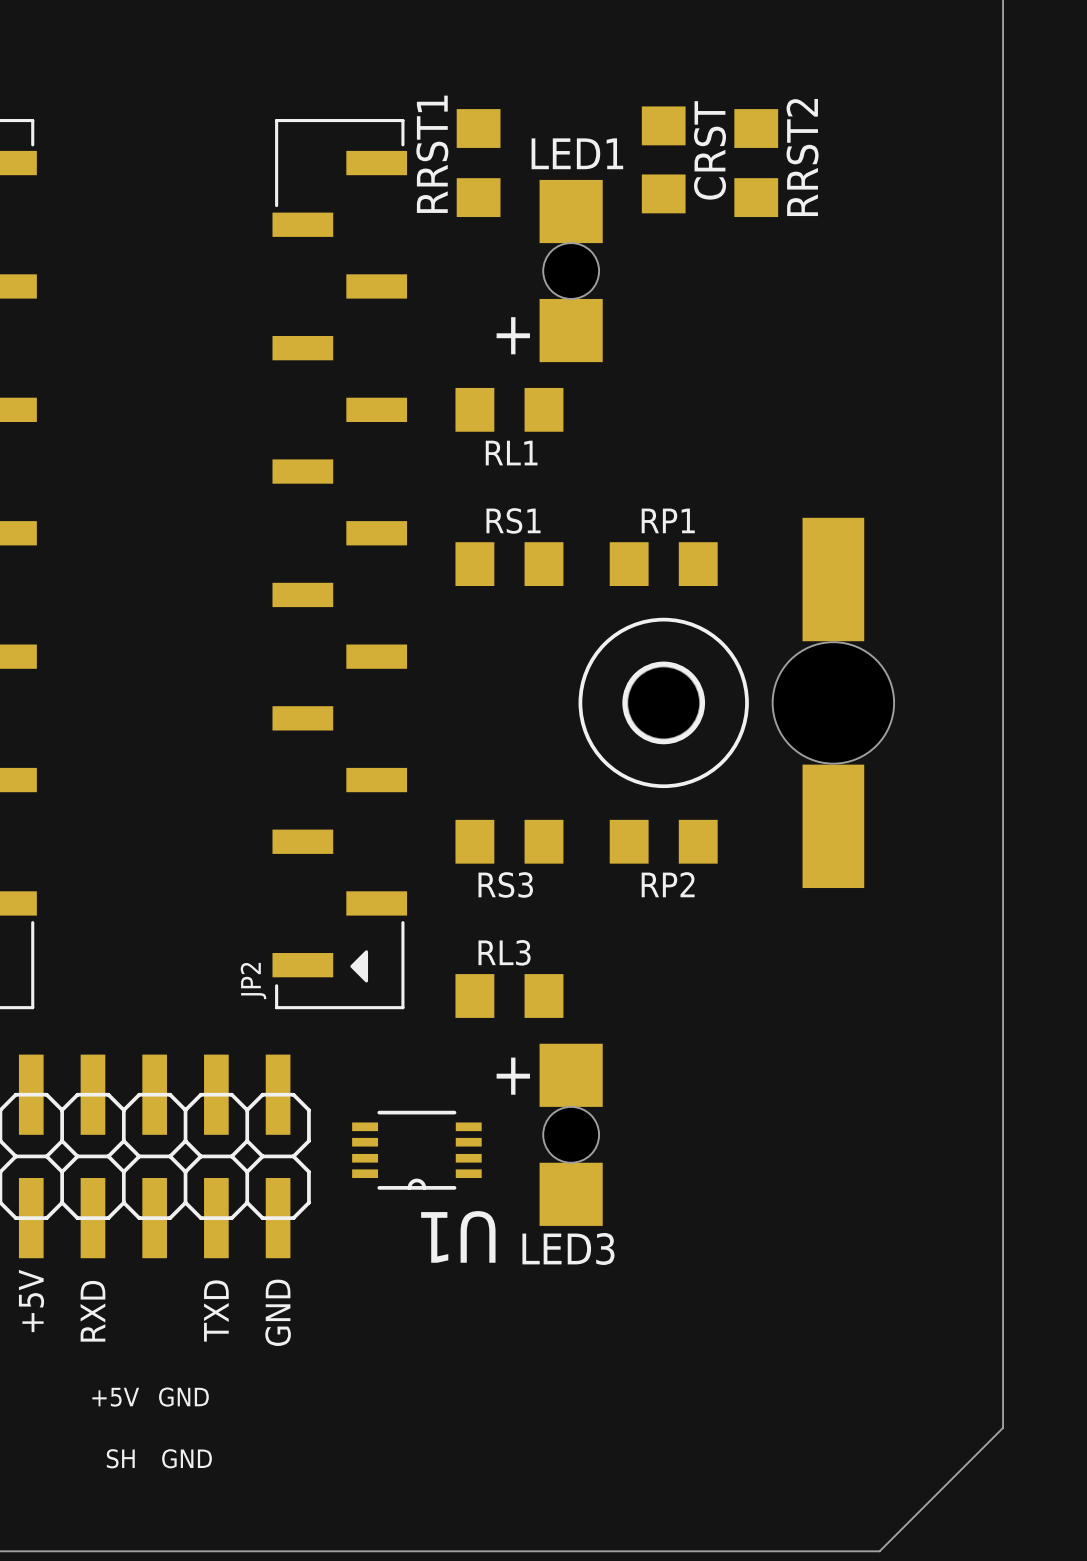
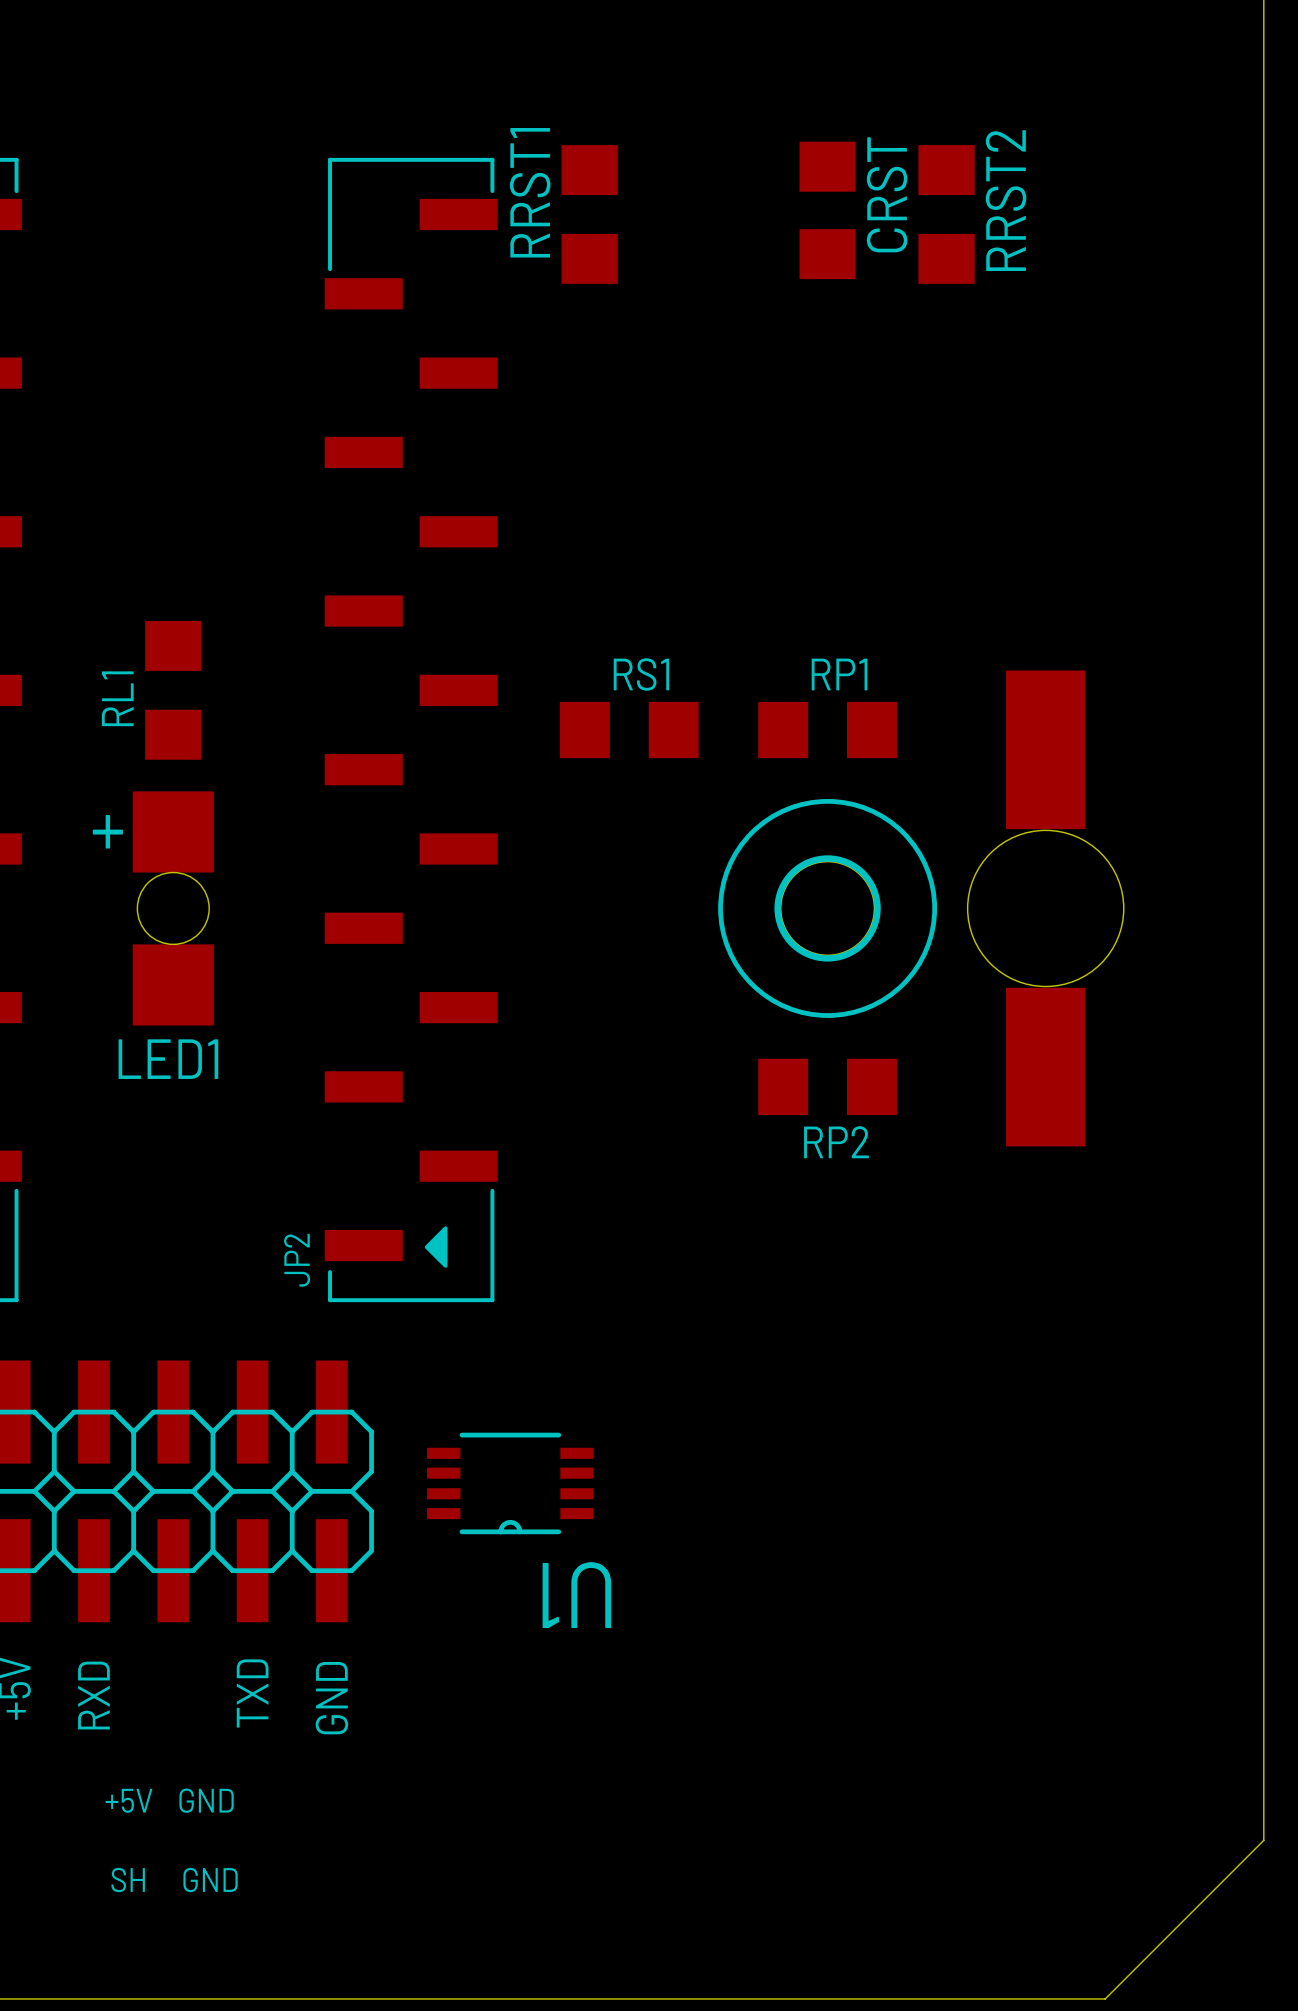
LED1 name position: LED1 (577, 153) -> LED1 (168, 1059)
LED1 position: (571, 271) -> (173, 908)
text: + (513, 335) -> none
RL1 rotation: 0° (509, 409) -> 90° clockwise (173, 690)
RL1 position: (509, 409) -> (173, 690)
text: none -> + (107, 831)
RS3: (509, 841) -> none
RL3: (509, 996) -> none
text: + (513, 1076) -> none
LED3: (571, 1134) -> none

